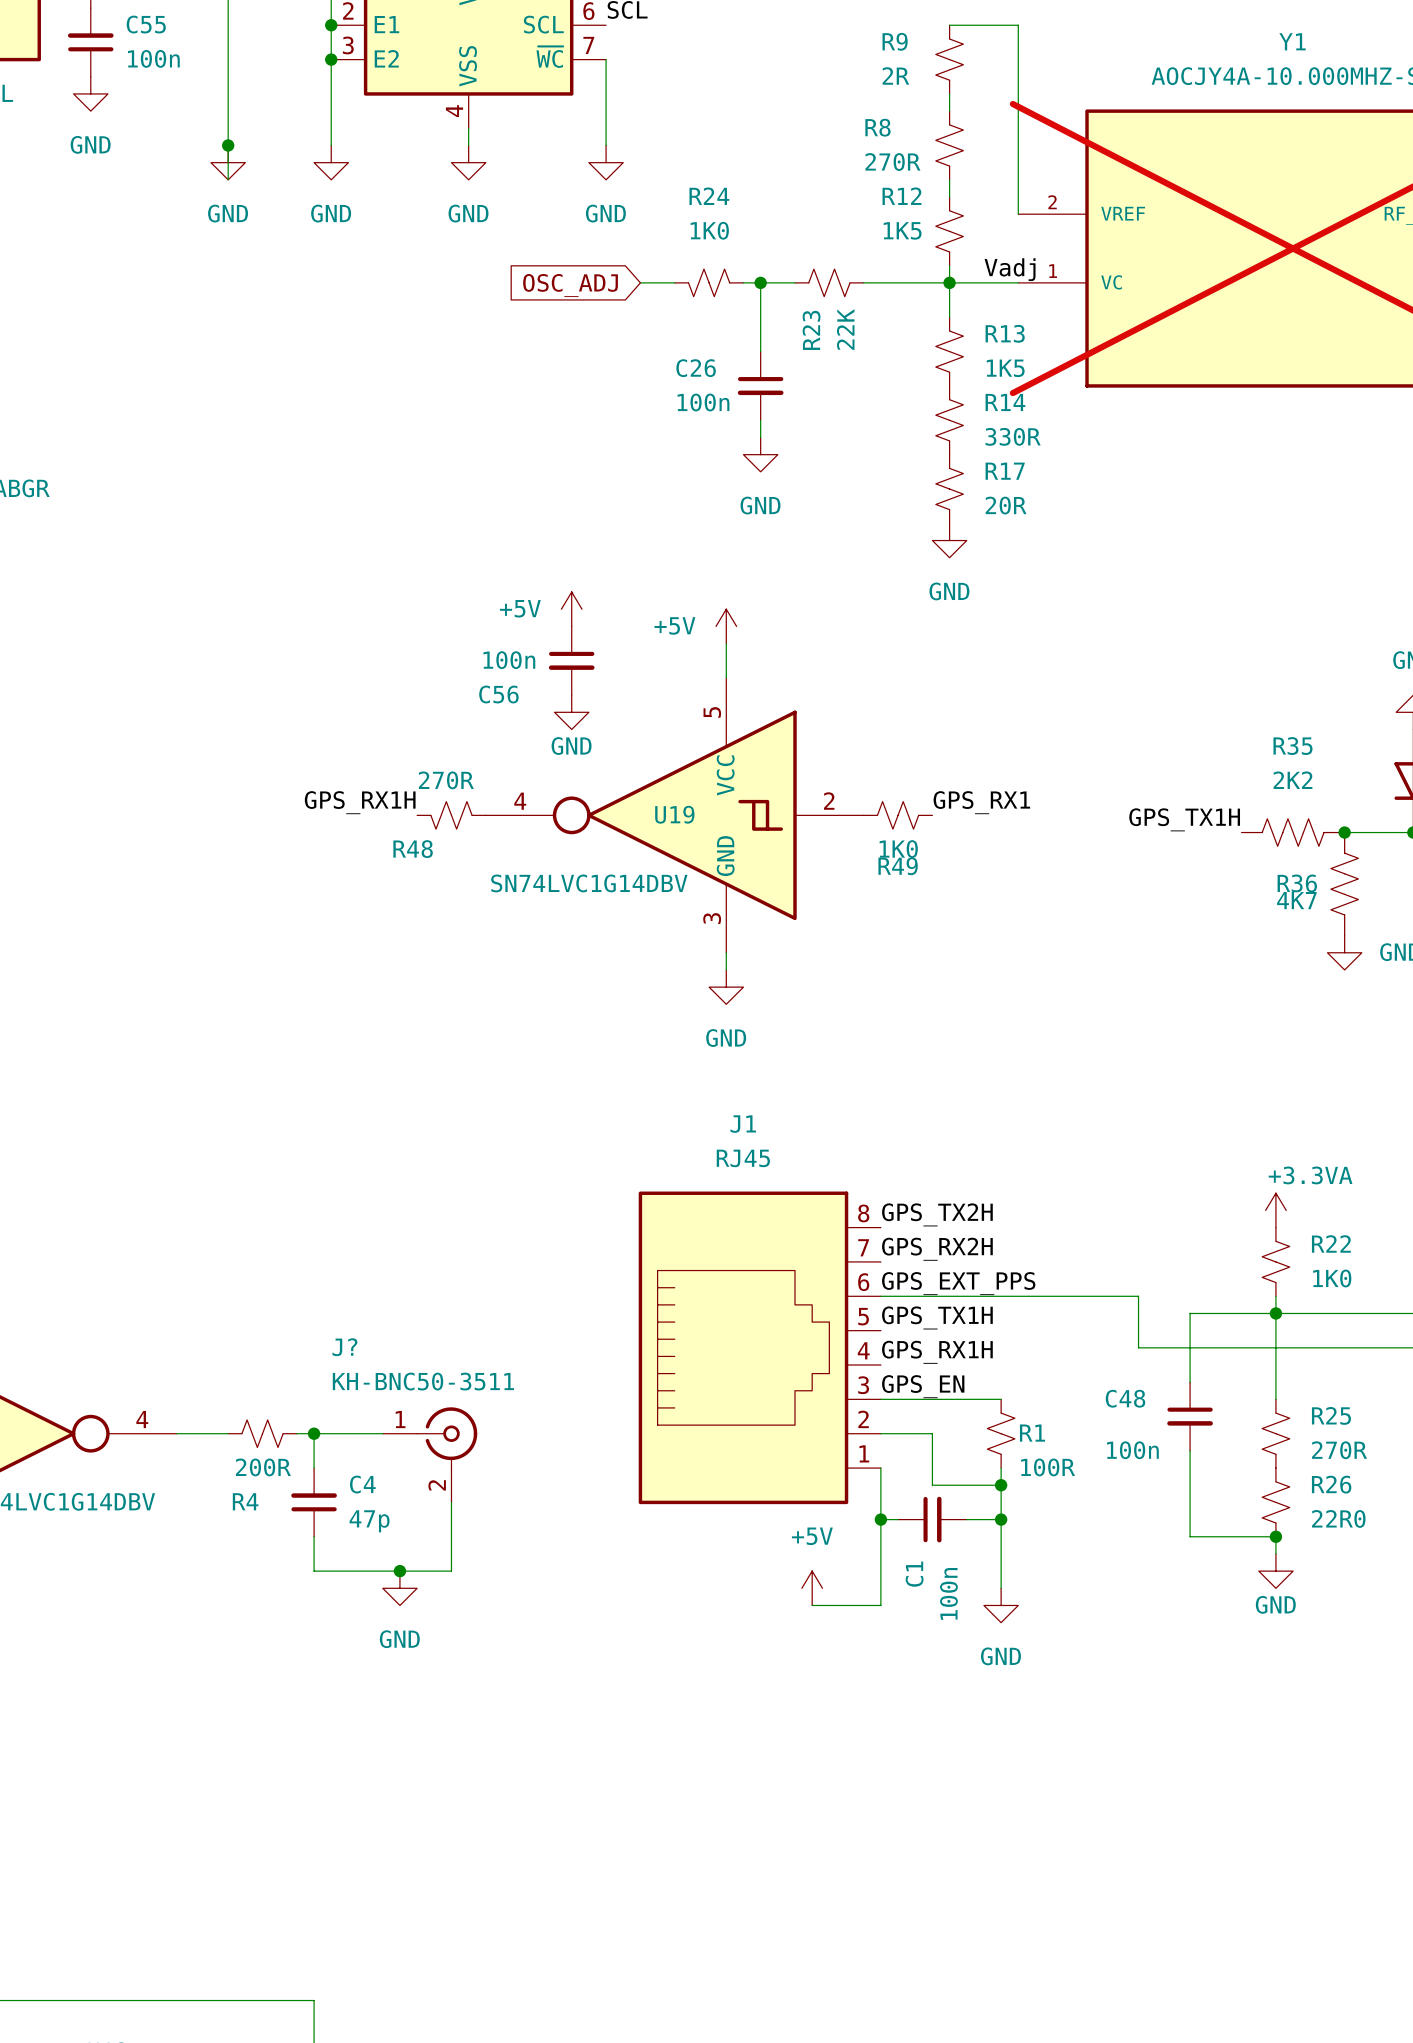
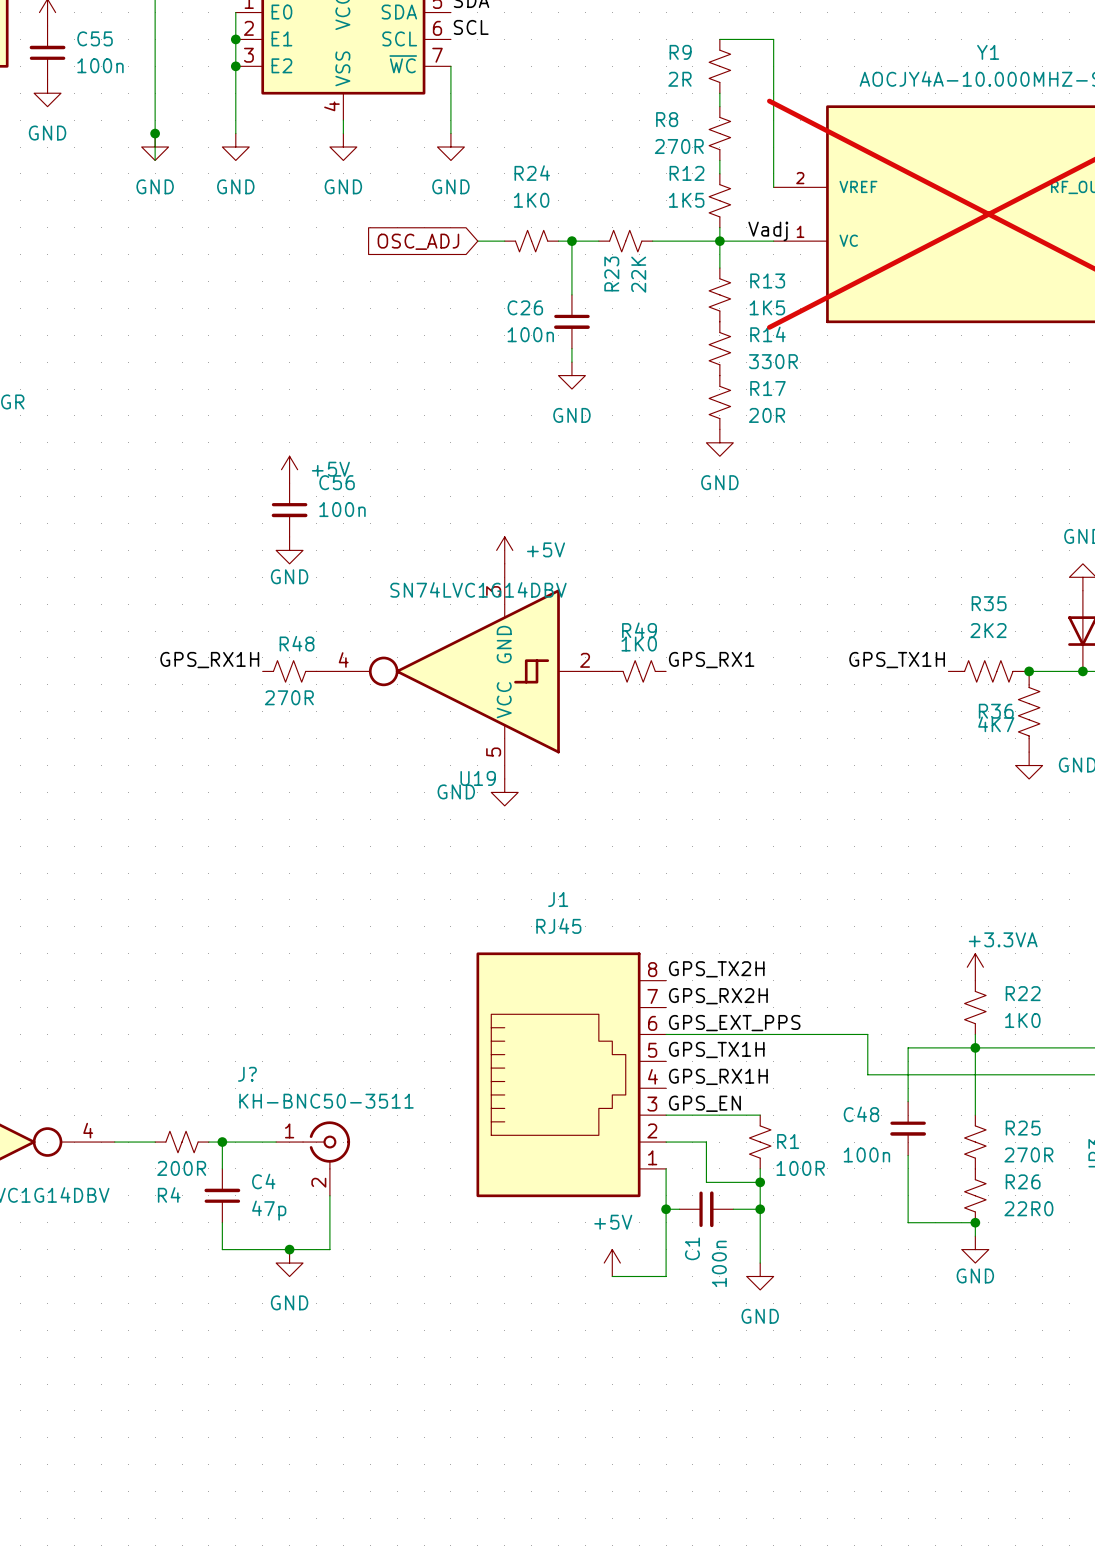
power symbol: none -> +5V (289, 469)
power symbol: +5V (571, 609) -> none
power symbol: +5V (726, 626) -> none
wire: (726, 643) (726, 677) -> none
C56 value position: 100n (509, 660) -> 100n (342, 509)
C56 position: (571, 660) -> (289, 510)
power symbol: none -> GND (289, 550)
power symbol: none -> +5V (504, 550)
C56 name position: C56 (498, 694) -> C56 (337, 482)
power symbol: GND (571, 712) -> none
R48 value position: 270R (446, 780) -> 270R (289, 697)
label position: GPS_RX1H (360, 802) -> GPS_RX1H (209, 660)
label position: GPS_RX1 (981, 802) -> GPS_RX1 (711, 660)
U19 name position: U19 (674, 814) -> U19 (478, 778)
R48 flip: as is (451, 815) -> left-right (289, 671)
R48 position: (451, 815) -> (289, 671)
U19 flip: as is (674, 815) -> up-down (464, 671)
R49 flip: as is (898, 815) -> left-right (639, 671)
R49 position: (898, 815) -> (639, 671)
R48 name position: R48 (413, 849) -> R48 (297, 643)
R49 value position: 1K0 (898, 849) -> 1K0 (639, 644)
R49 name position: R49 (898, 866) -> R49 (639, 630)
U19 value position: SN74LVC1G14DBV (589, 883) -> SN74LVC1G14DBV (478, 589)
wire: (726, 952) (726, 969) -> none
power symbol position: GND (726, 987) -> GND (504, 792)
power symbol text position: GND (726, 1038) -> GND (456, 791)

